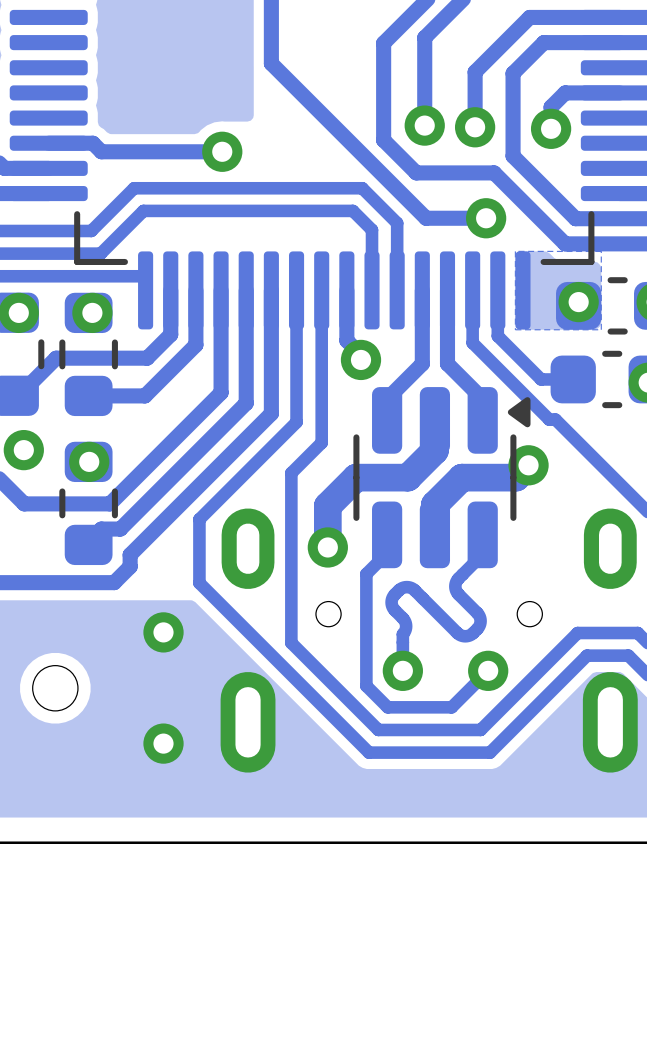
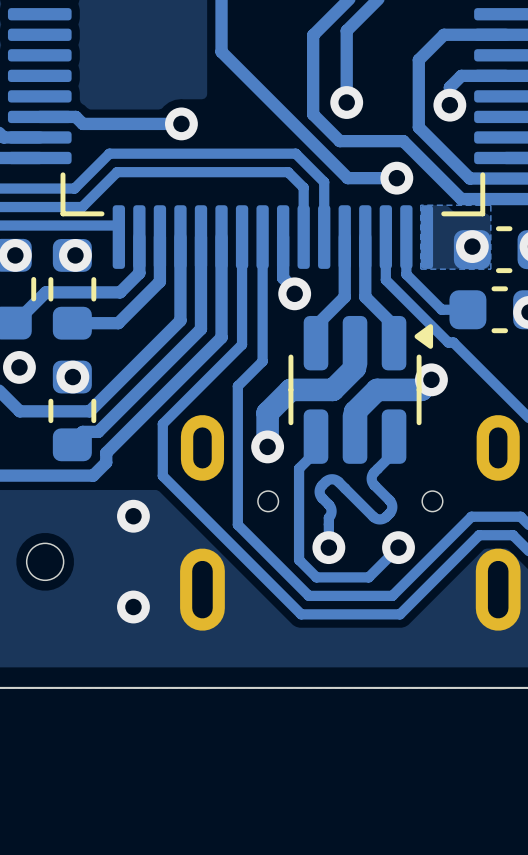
track: (619, 17) (529, 17) (475, 72) (475, 127) -> none
via: (475, 127) -> none

